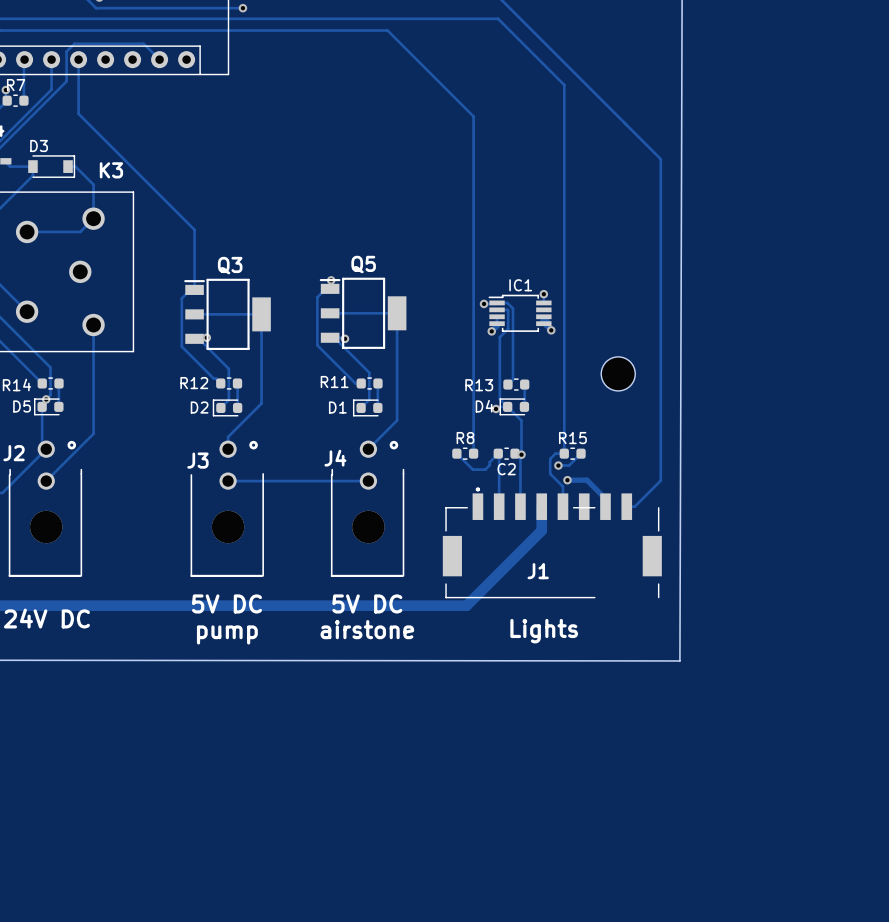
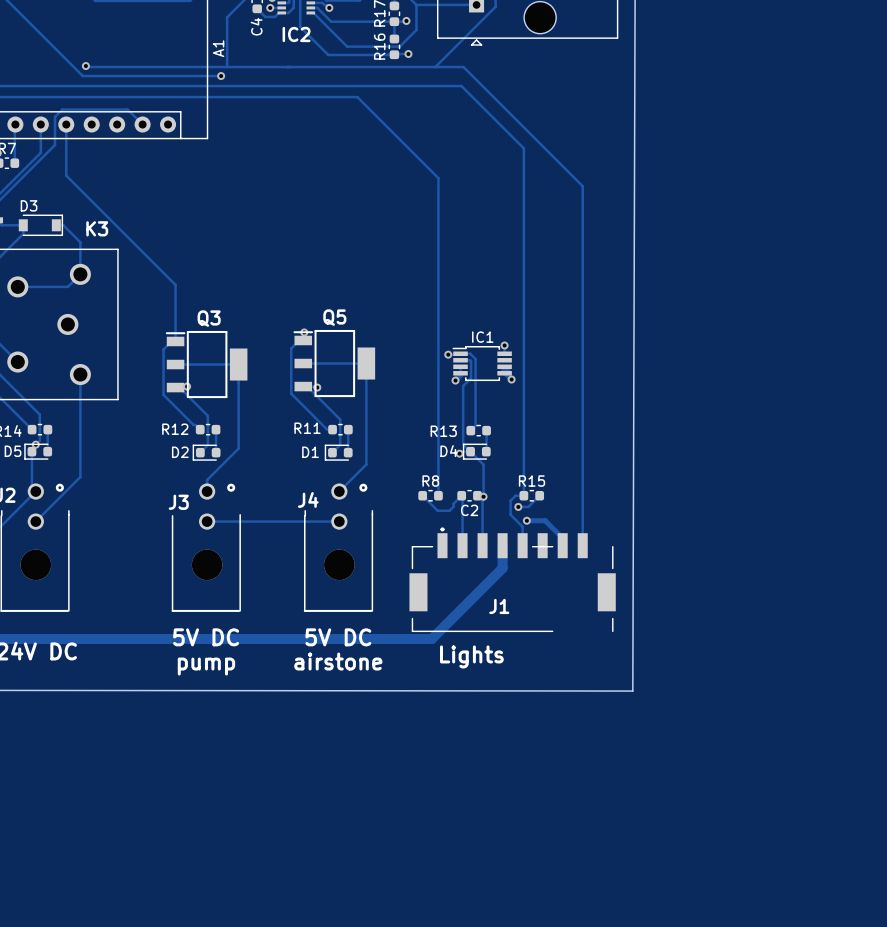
track: (626, 125) (660, 159) (660, 480) (634, 506) (626, 506) -> (582, 186) (582, 545)
part: (618, 373) -> none
text position: Lights (544, 631) -> Lights (471, 656)

